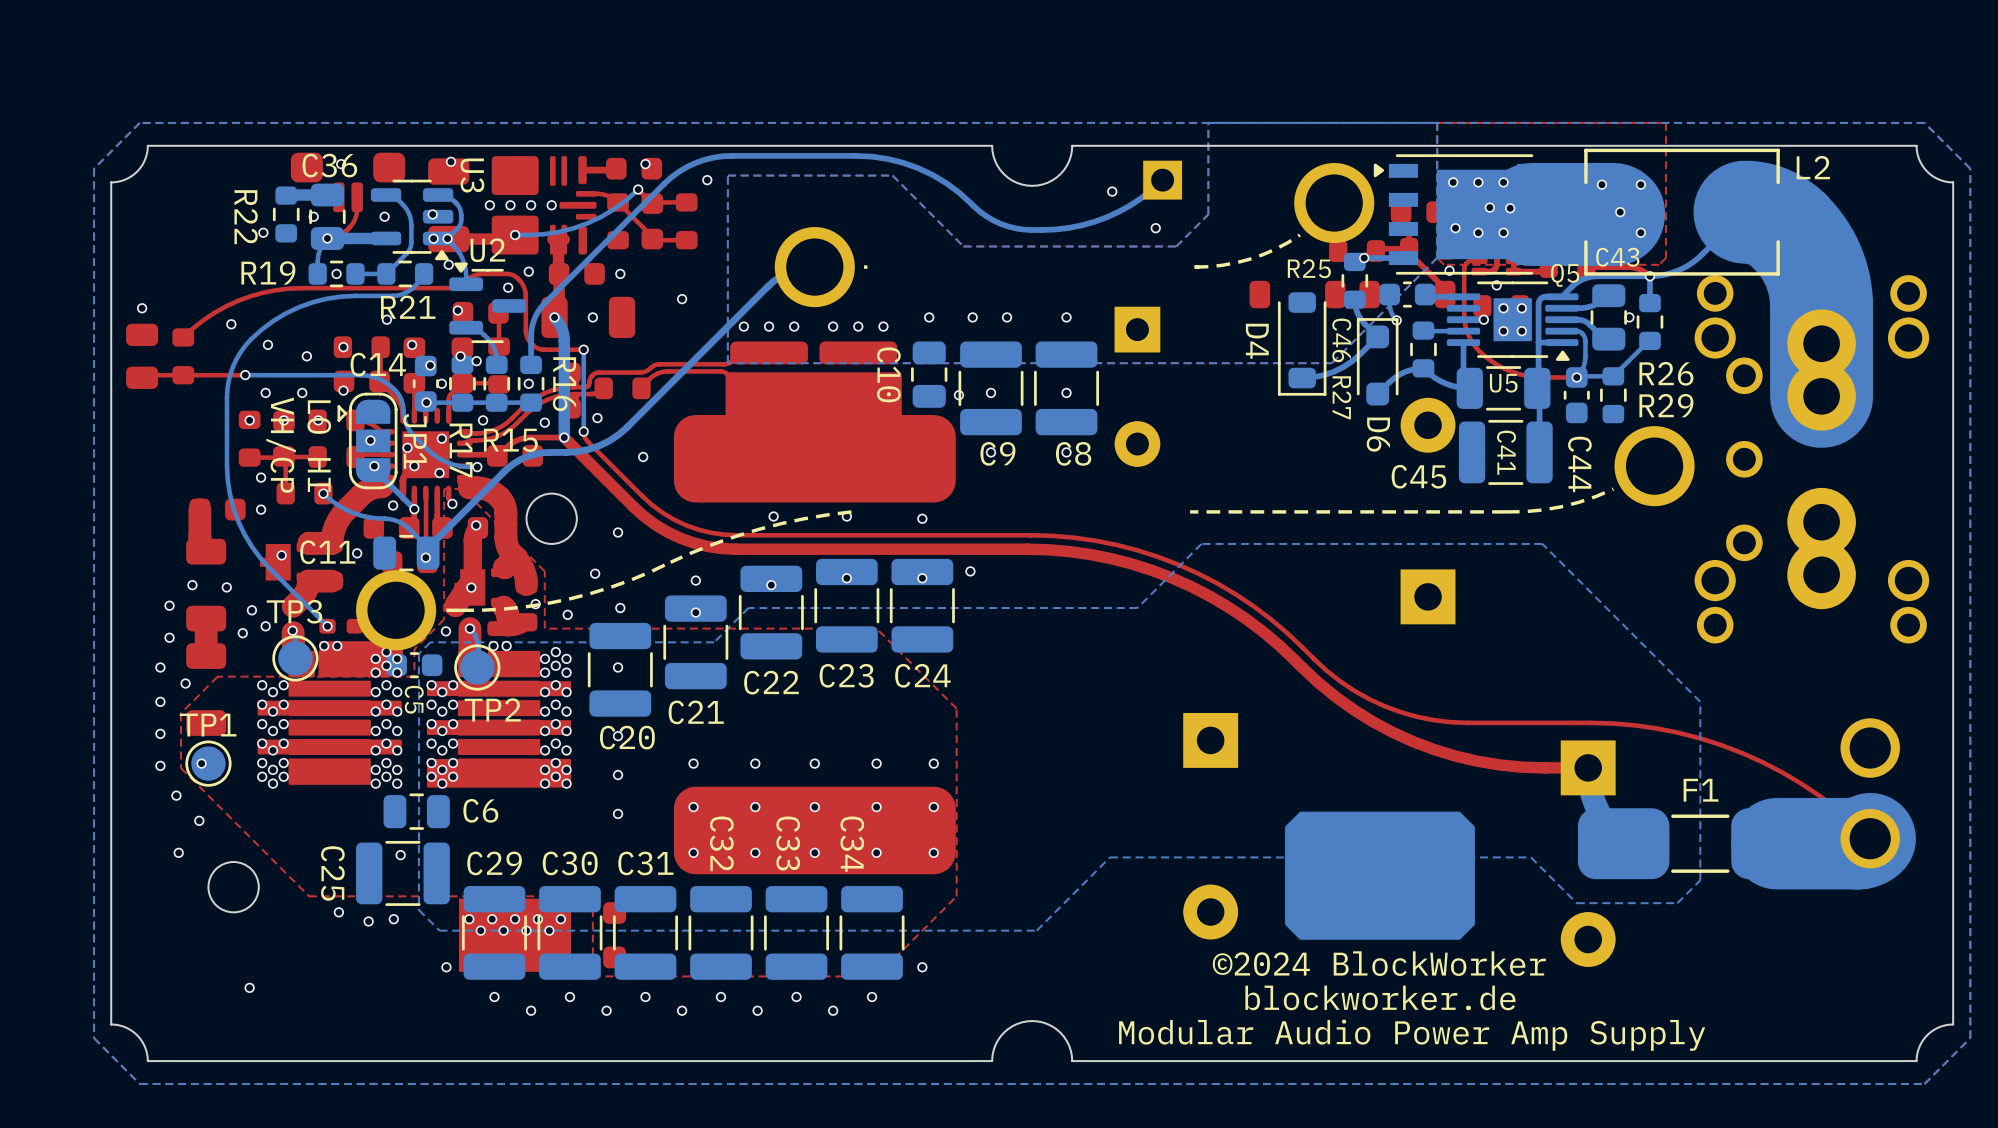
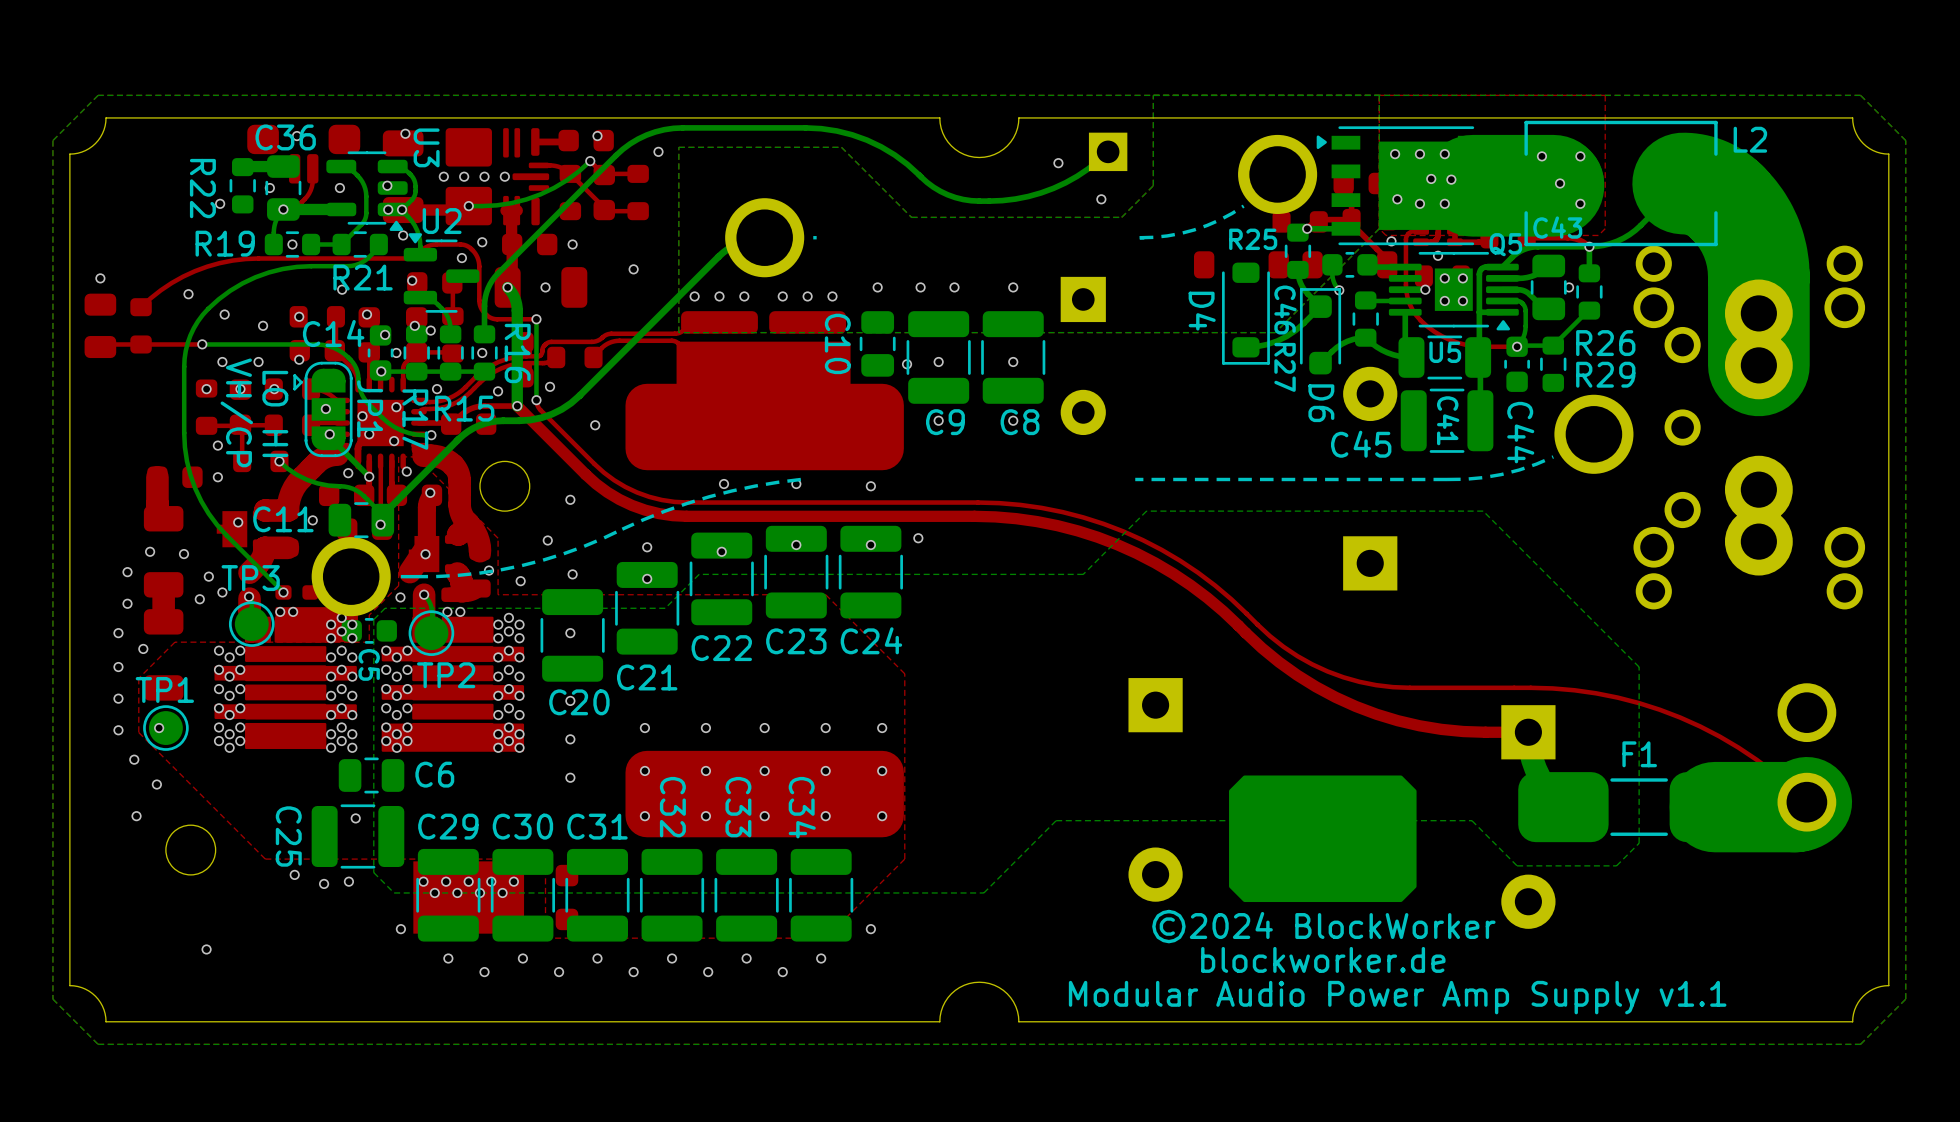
text: Modular Audio Power Amp Supply (1412, 1035) -> Modular Audio Power Amp Supply v1.1 (1397, 997)

